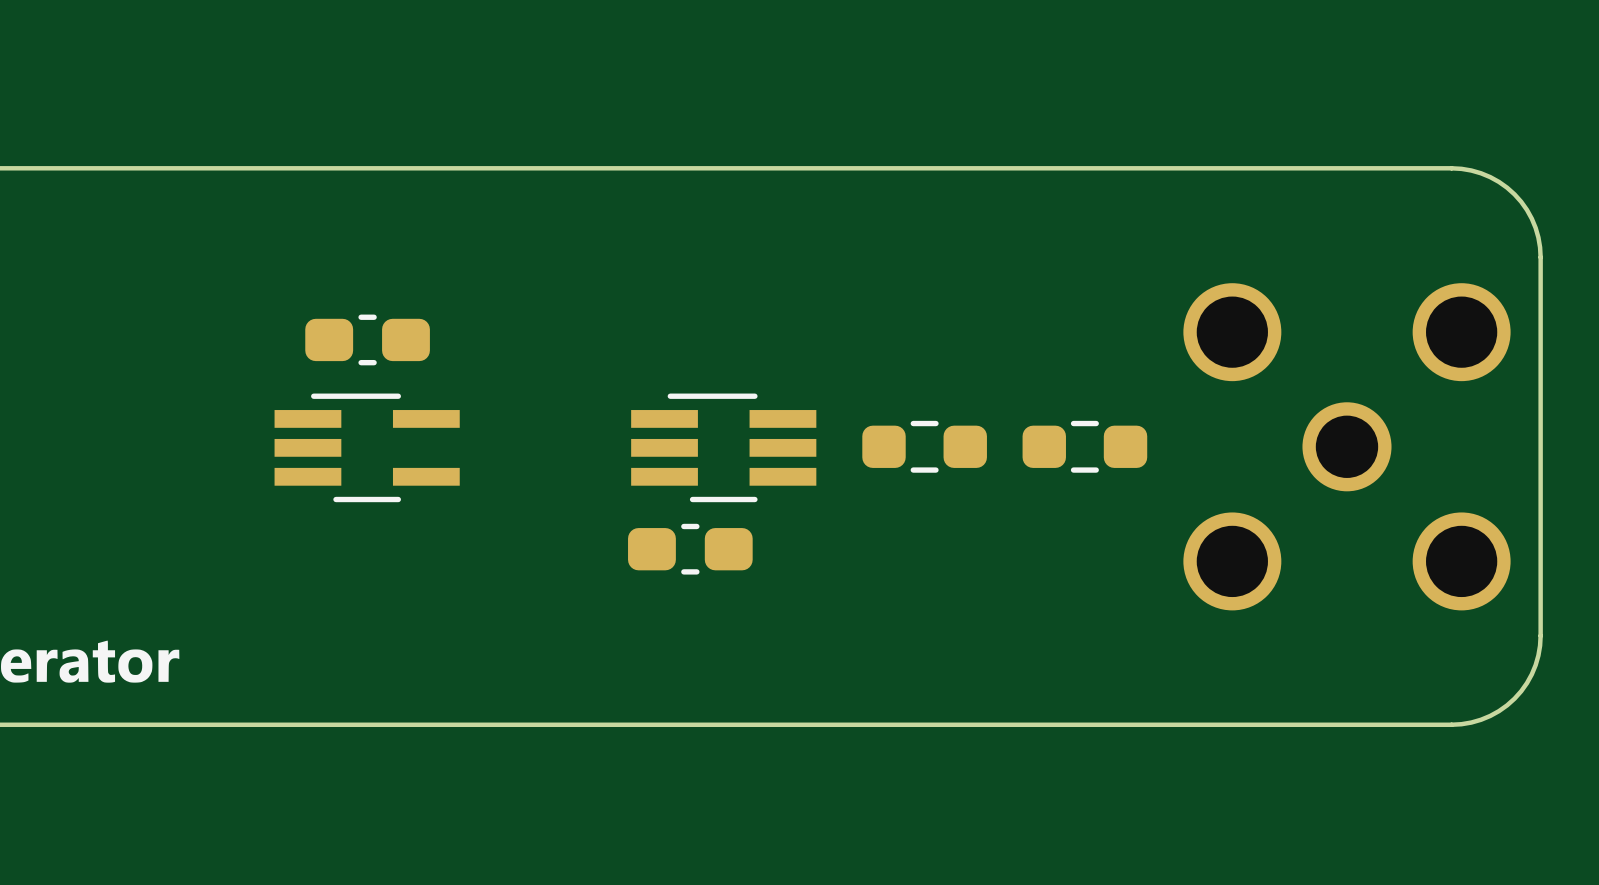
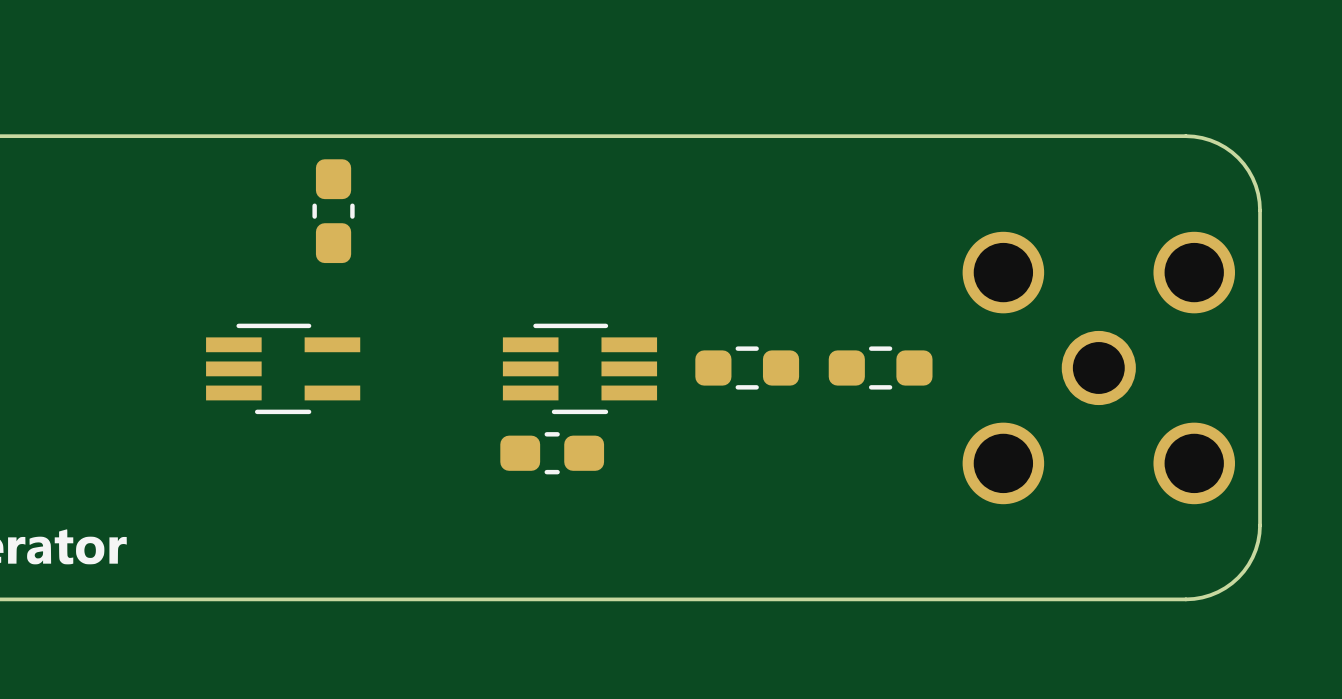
part rotation: 0° (367, 339) -> 90° clockwise (333, 211)
part position: (367, 339) -> (333, 211)

